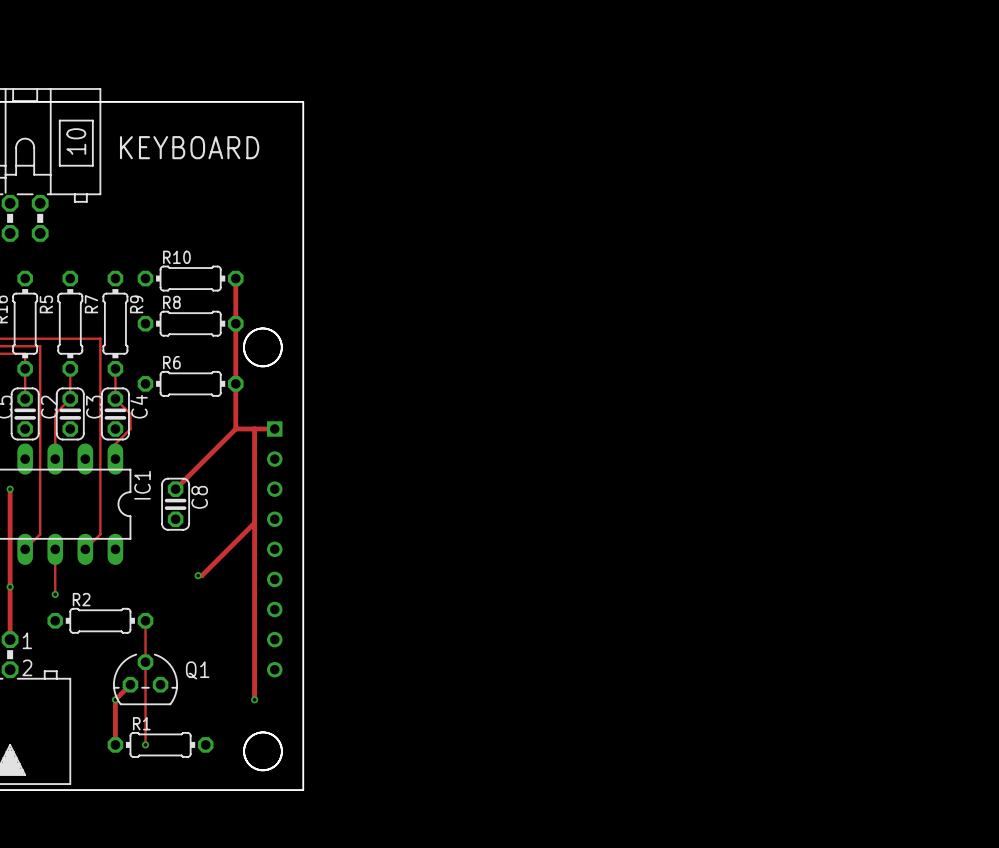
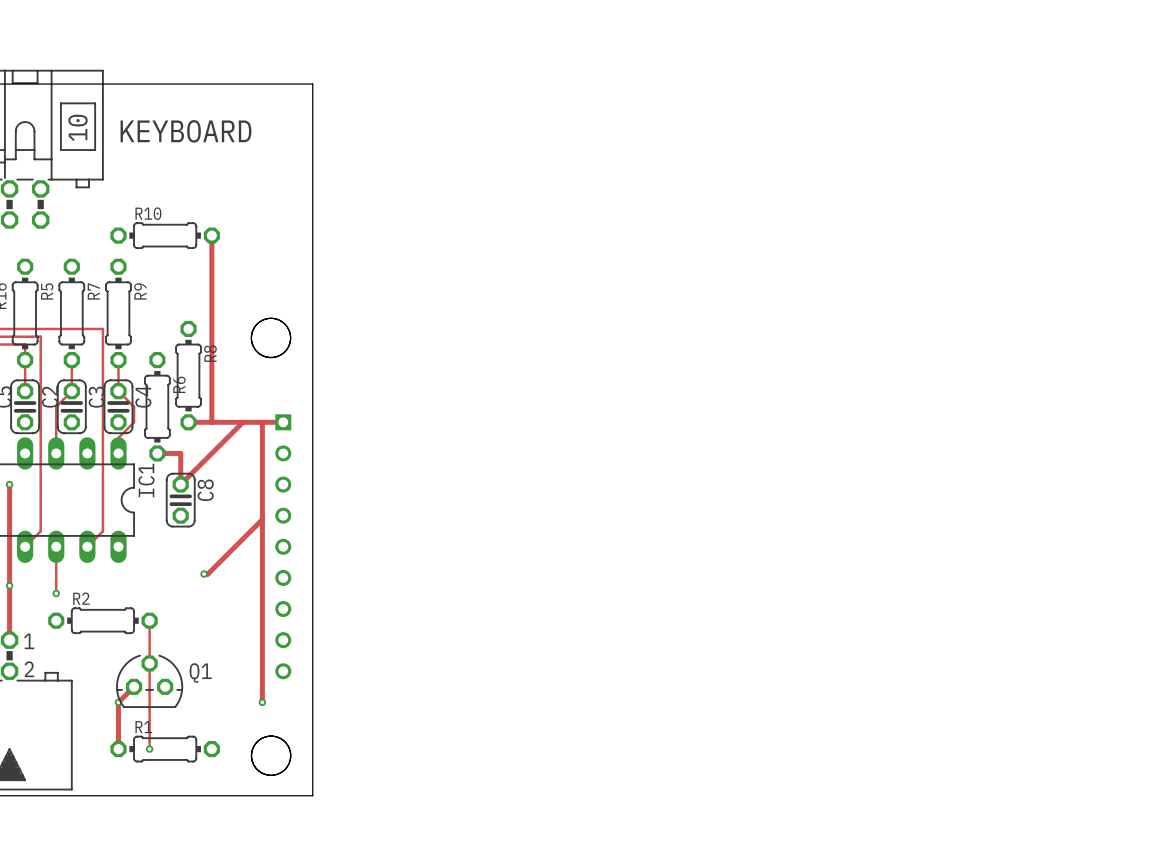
track: none -> (211, 235) (211, 422)
R10 position: (190, 278) -> (165, 235)
track: (235, 278) (235, 428) -> (188, 422) (242, 422)
R8 rotation: 0° (190, 323) -> 90° clockwise (188, 375)
R6 rotation: 0° (190, 383) -> 90° clockwise (157, 406)
track: none -> (157, 453) (180, 453) (180, 484)

